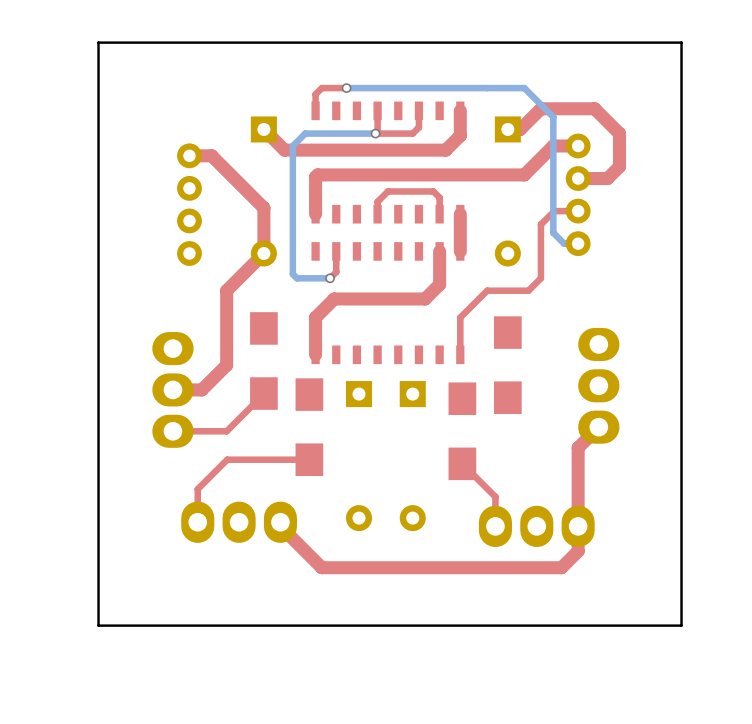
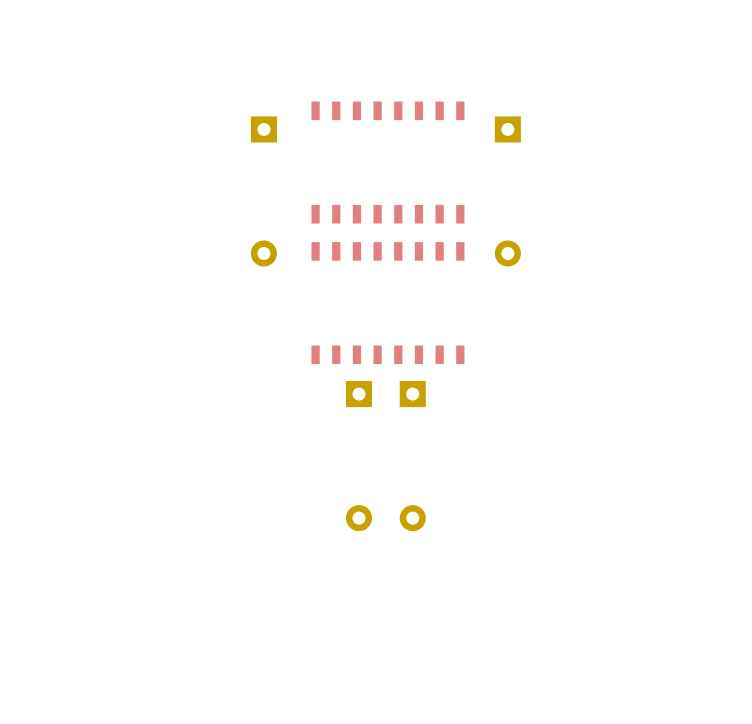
board edge: (681, 42) (681, 625) (98, 625) (98, 42) (681, 42) -> none
top track: (346, 88) (321, 88) (315, 94) (315, 110) -> none
bottom track: (346, 88) (524, 88) (553, 117) (553, 232) (564, 243) (578, 243) -> none
via: (346, 88) -> none
top track: (418, 110) (418, 127) (412, 133) (375, 133) (377, 131) (377, 110) -> none
top track: (460, 110) (460, 135) (445, 150) (284, 150) (263, 129) -> none
top track: (507, 129) (520, 129) (540, 108) (594, 108) (619, 133) (619, 166) (607, 178) (578, 178) -> none
bottom track: (375, 133) (305, 133) (292, 145) (292, 274) (296, 278) (330, 278) -> none
via: (375, 133) -> none
top track: (578, 145) (553, 145) (524, 174) (317, 174) (315, 177) (315, 214) -> none
top track: (189, 155) (211, 155) (263, 208) (263, 253) (226, 290) (226, 365) (201, 389) (172, 389) -> none
part: (578, 194) -> none
part: (189, 204) -> none
top track: (578, 211) (554, 211) (540, 224) (540, 278) (528, 290) (487, 290) (460, 317) (460, 354) -> none
top track: (439, 214) (439, 197) (433, 191) (387, 191) (377, 201) (377, 214) -> none
top track: (460, 214) (460, 251) -> none
top track: (336, 251) (336, 272) (330, 278) -> none
top track: (439, 251) (439, 284) (425, 298) (334, 298) (315, 317) (315, 354) -> none
via: (330, 278) -> none
part: (263, 360) -> none
part: (507, 365) -> none
part: (598, 385) -> none
part: (172, 389) -> none
top track: (263, 393) (226, 431) (172, 431) -> none
part: (309, 427) -> none
top track: (598, 427) (578, 447) (578, 551) (561, 567) (321, 567) (280, 526) (280, 522) -> none
part: (462, 431) -> none
top track: (309, 459) (227, 459) (197, 489) (197, 522) -> none
top track: (462, 463) (495, 496) (495, 526) -> none
part: (239, 522) -> none
part: (536, 526) -> none

